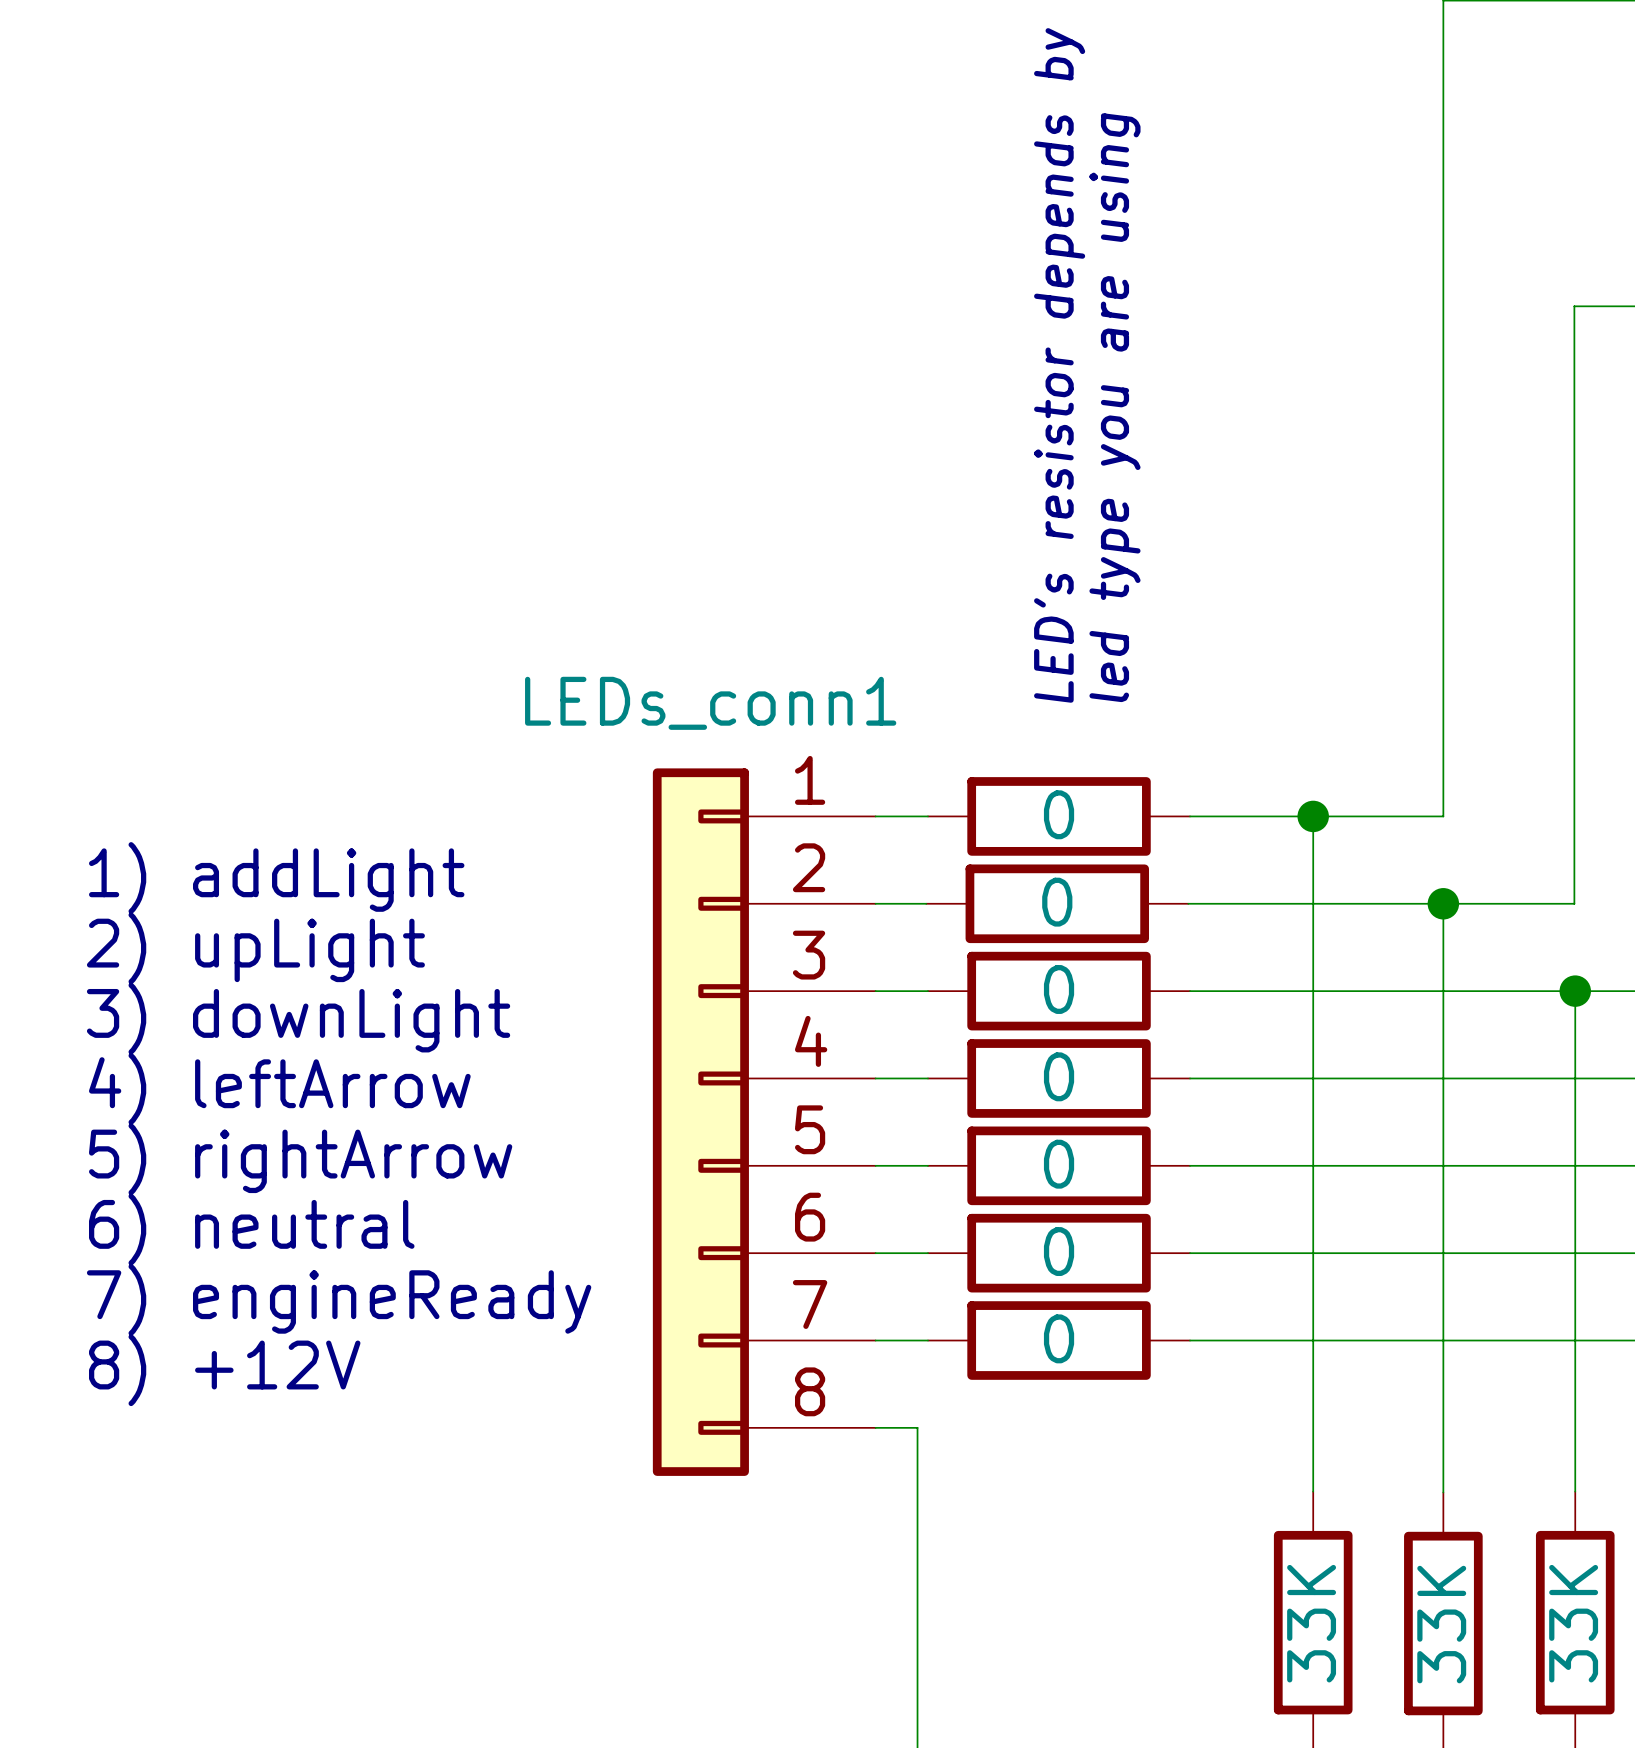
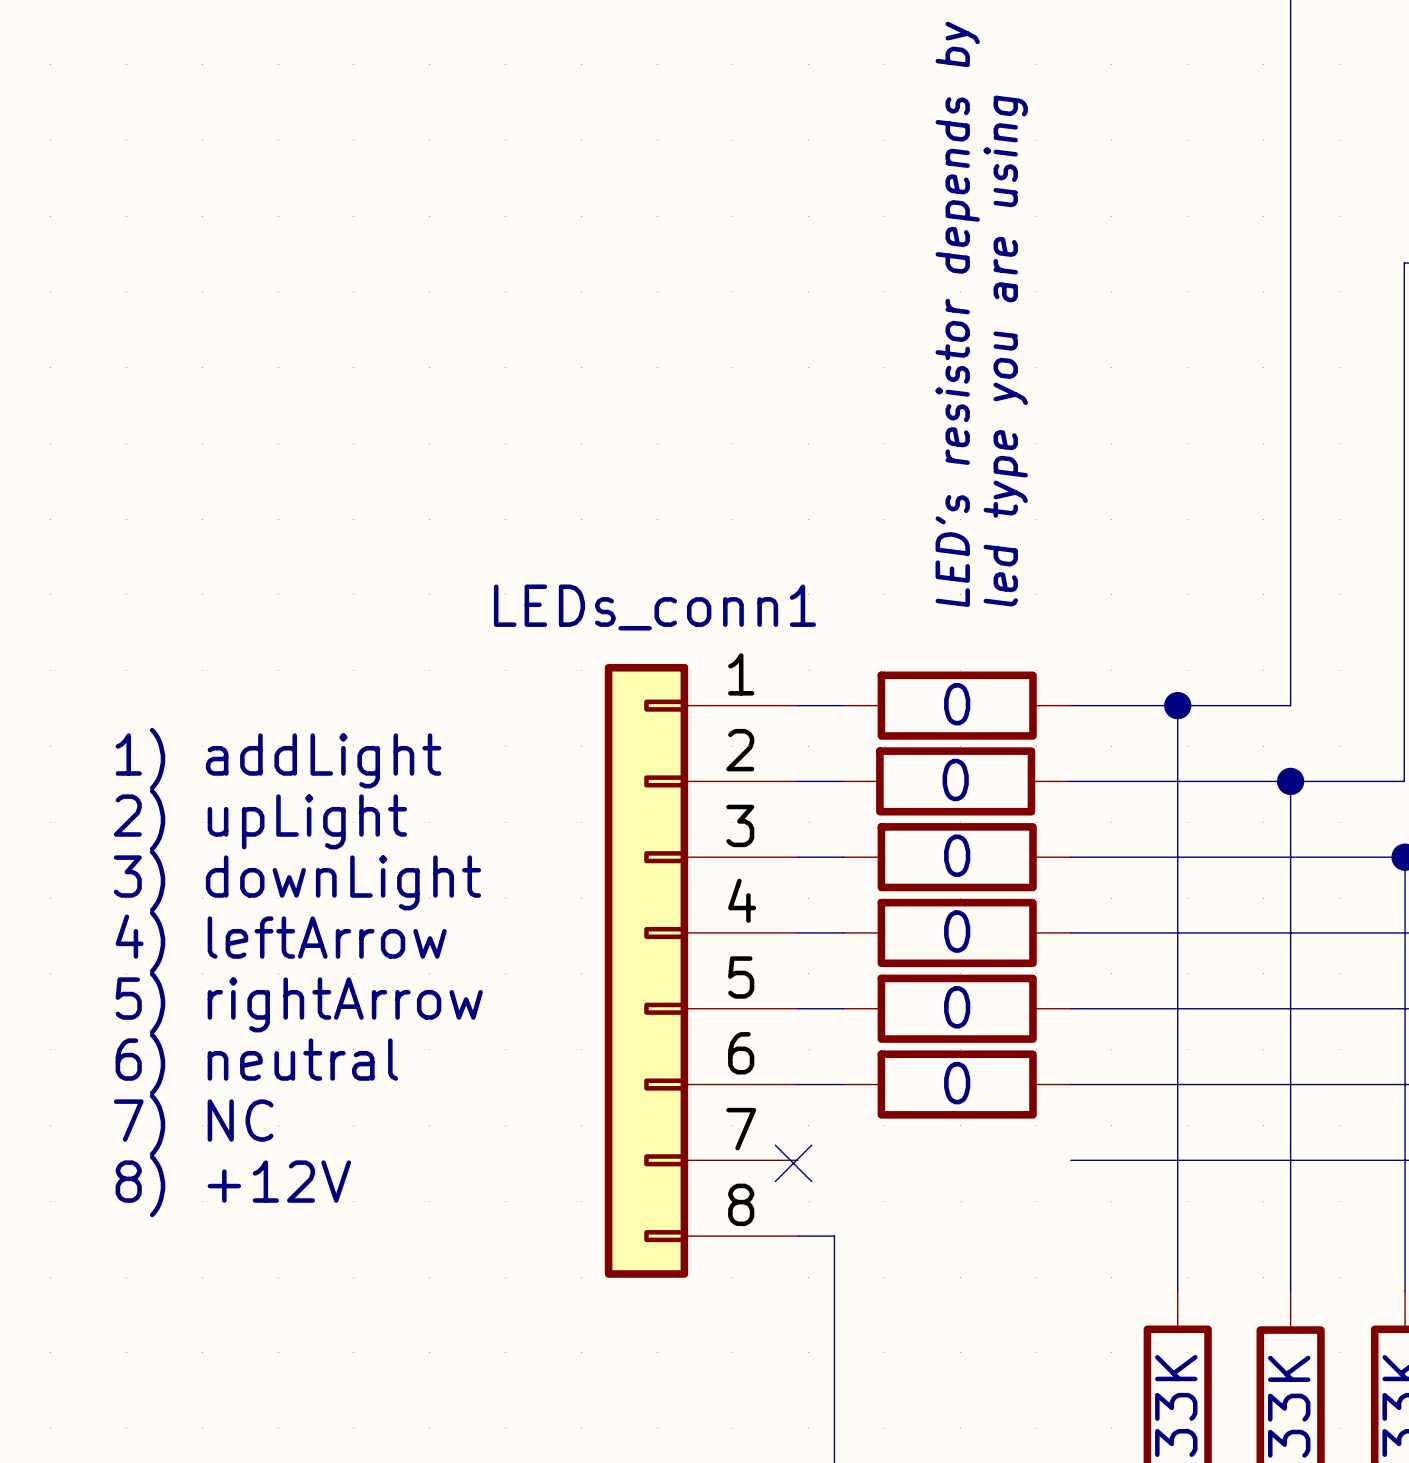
text: 7) engineReady (339, 1299) -> 7) NC (193, 1125)
wire: (875, 1340) (928, 1340) -> none
part: 0 (1059, 1340) -> none
no-connect mark: none -> (793, 1163)

